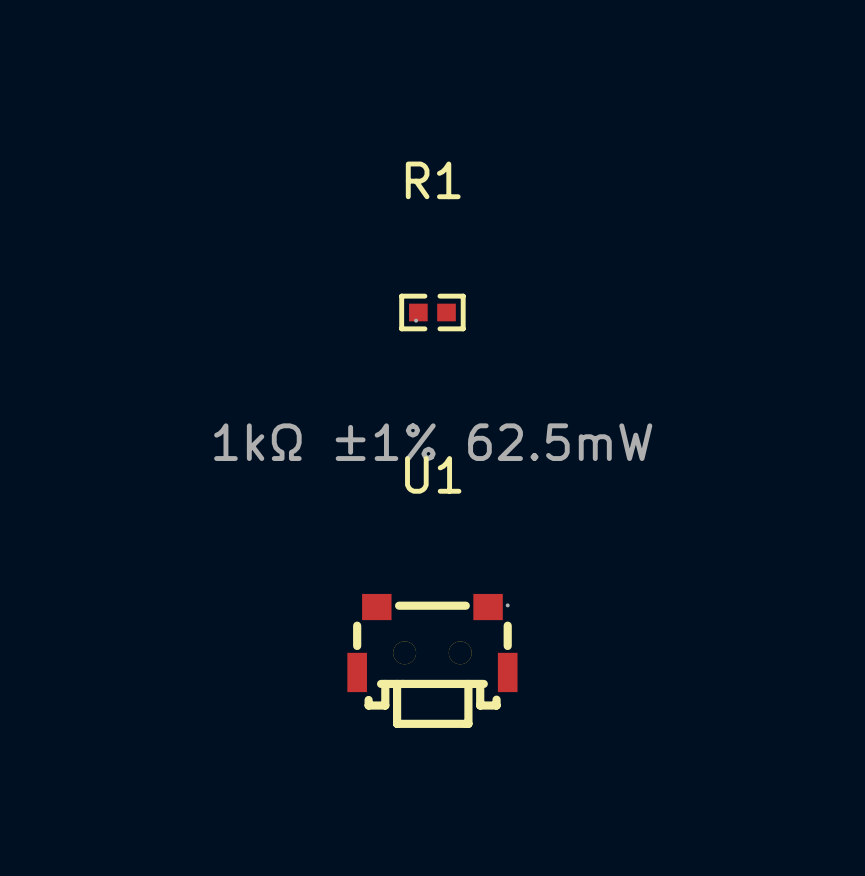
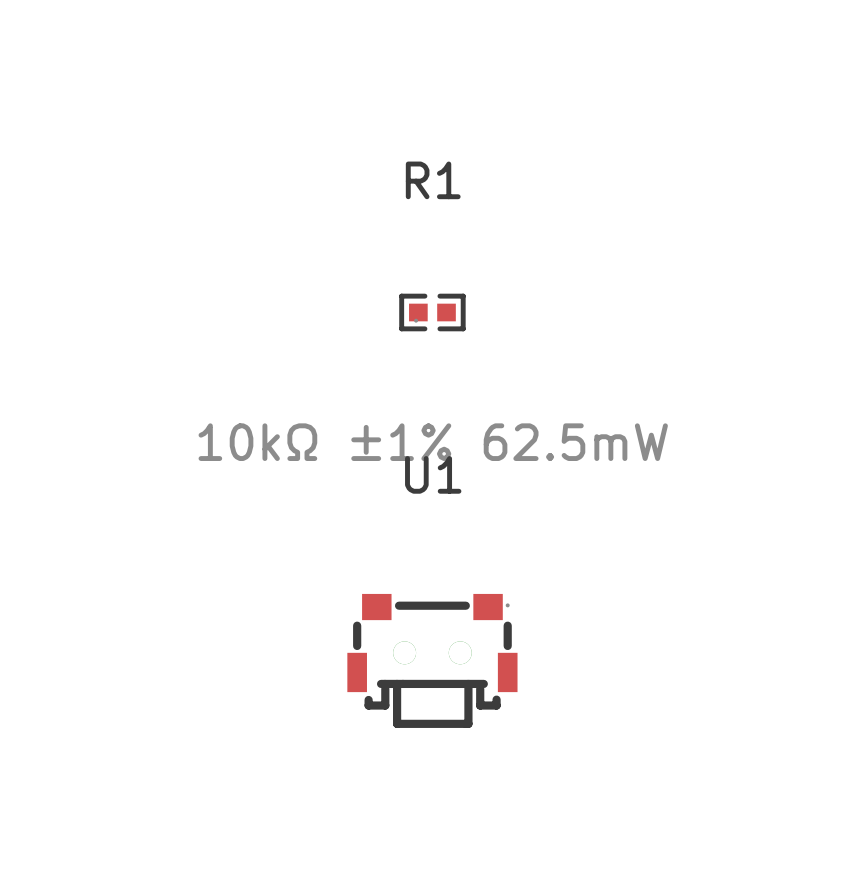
R1 value: 1kΩ ±1% 62.5mW (433, 442) -> 10kΩ ±1% 62.5mW (433, 442)

